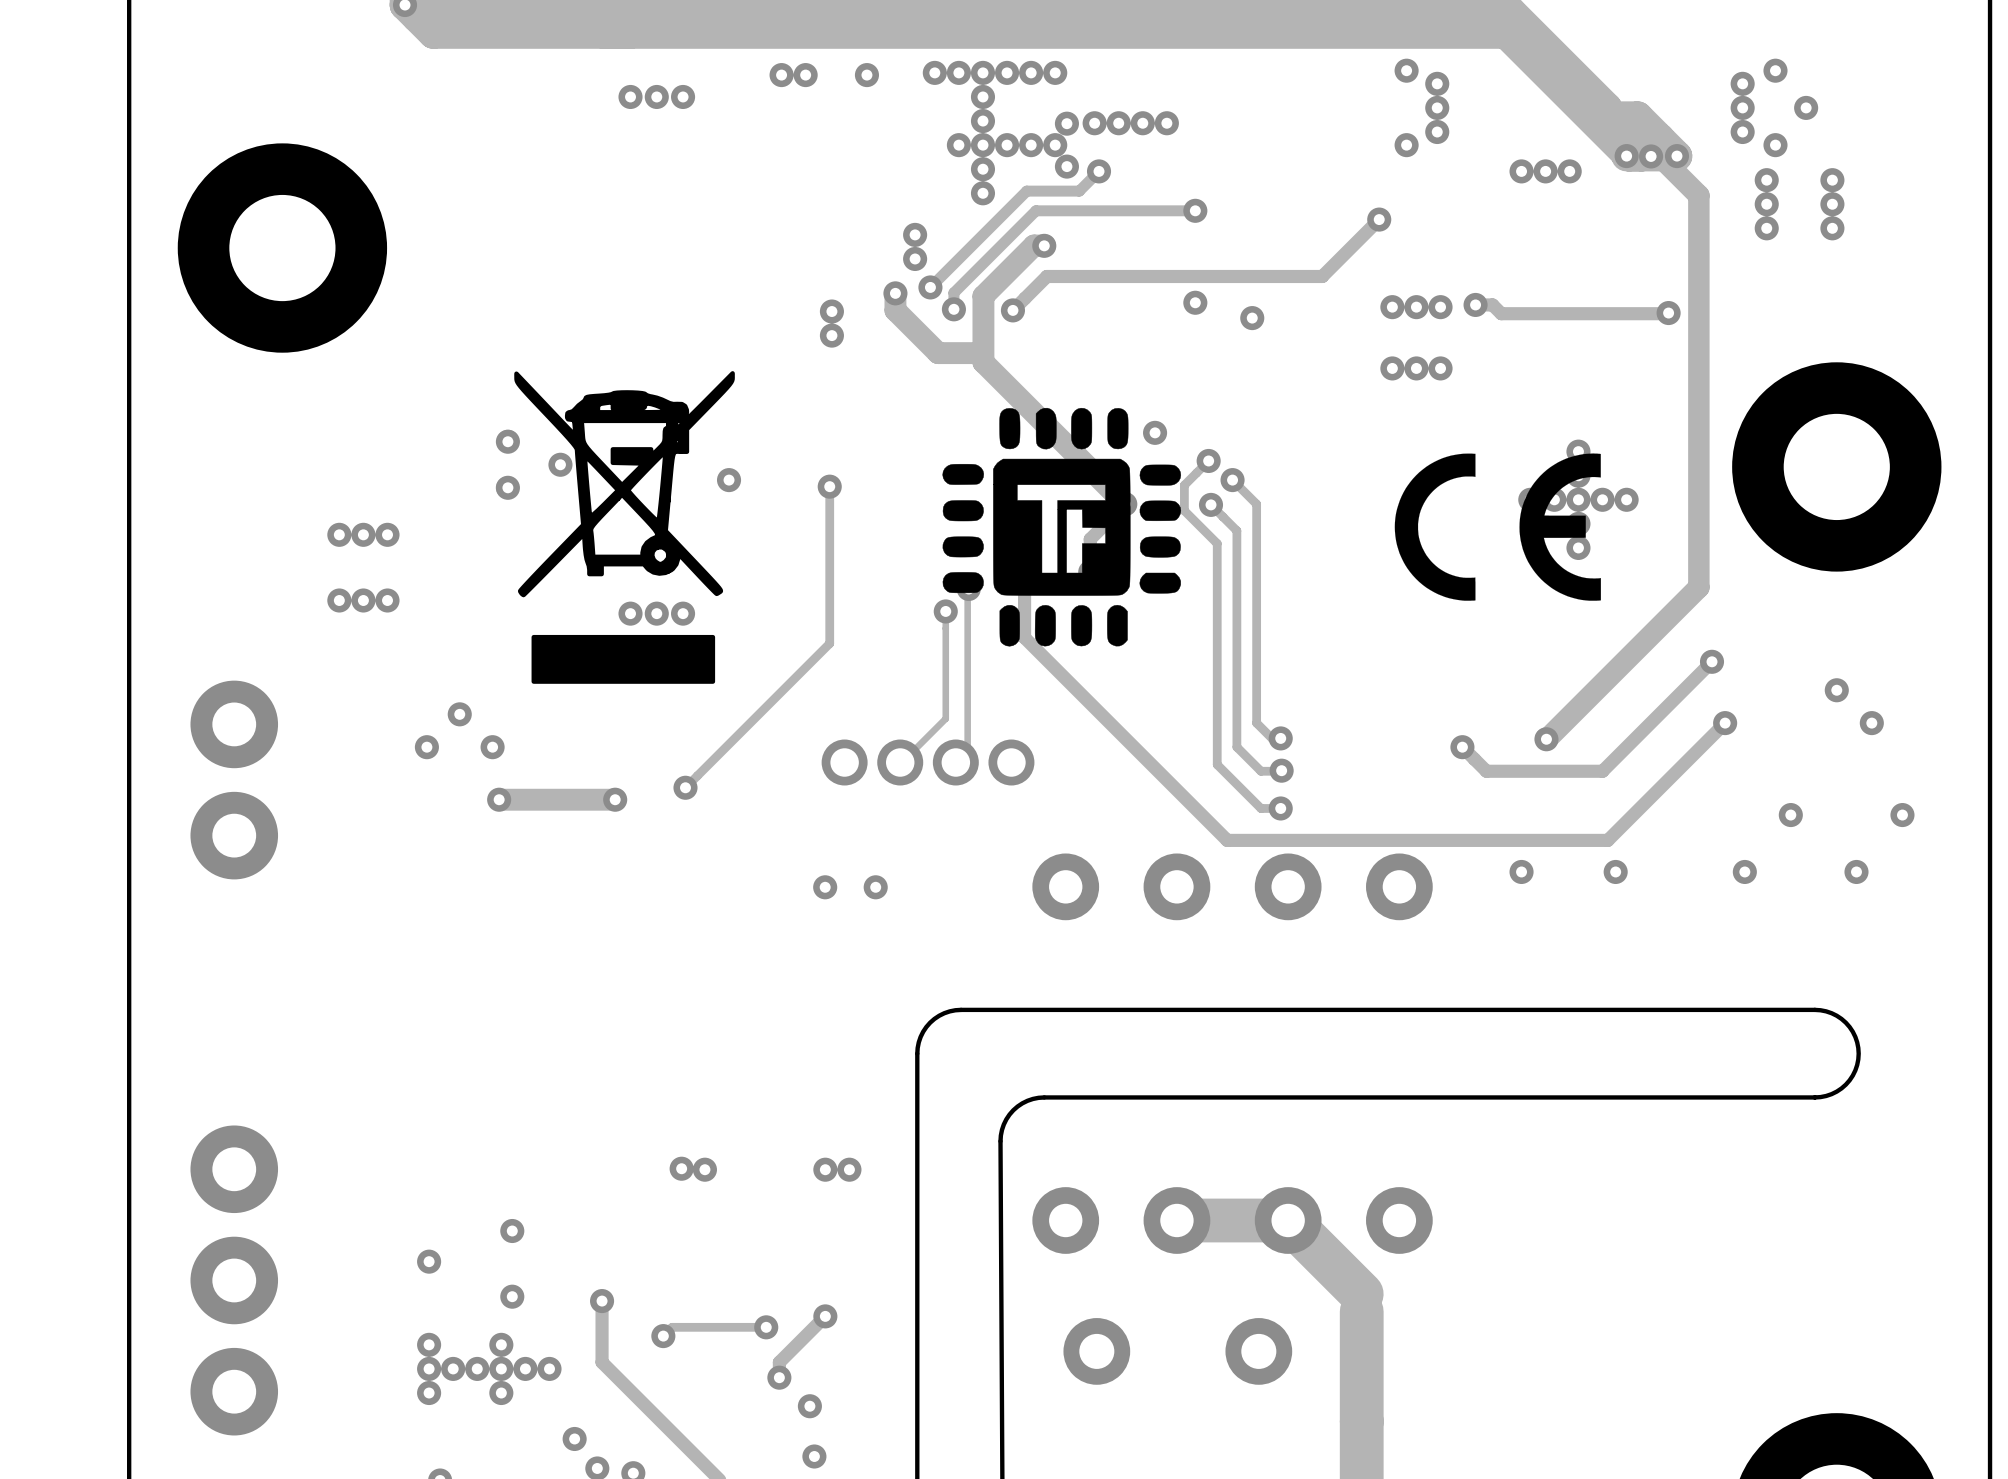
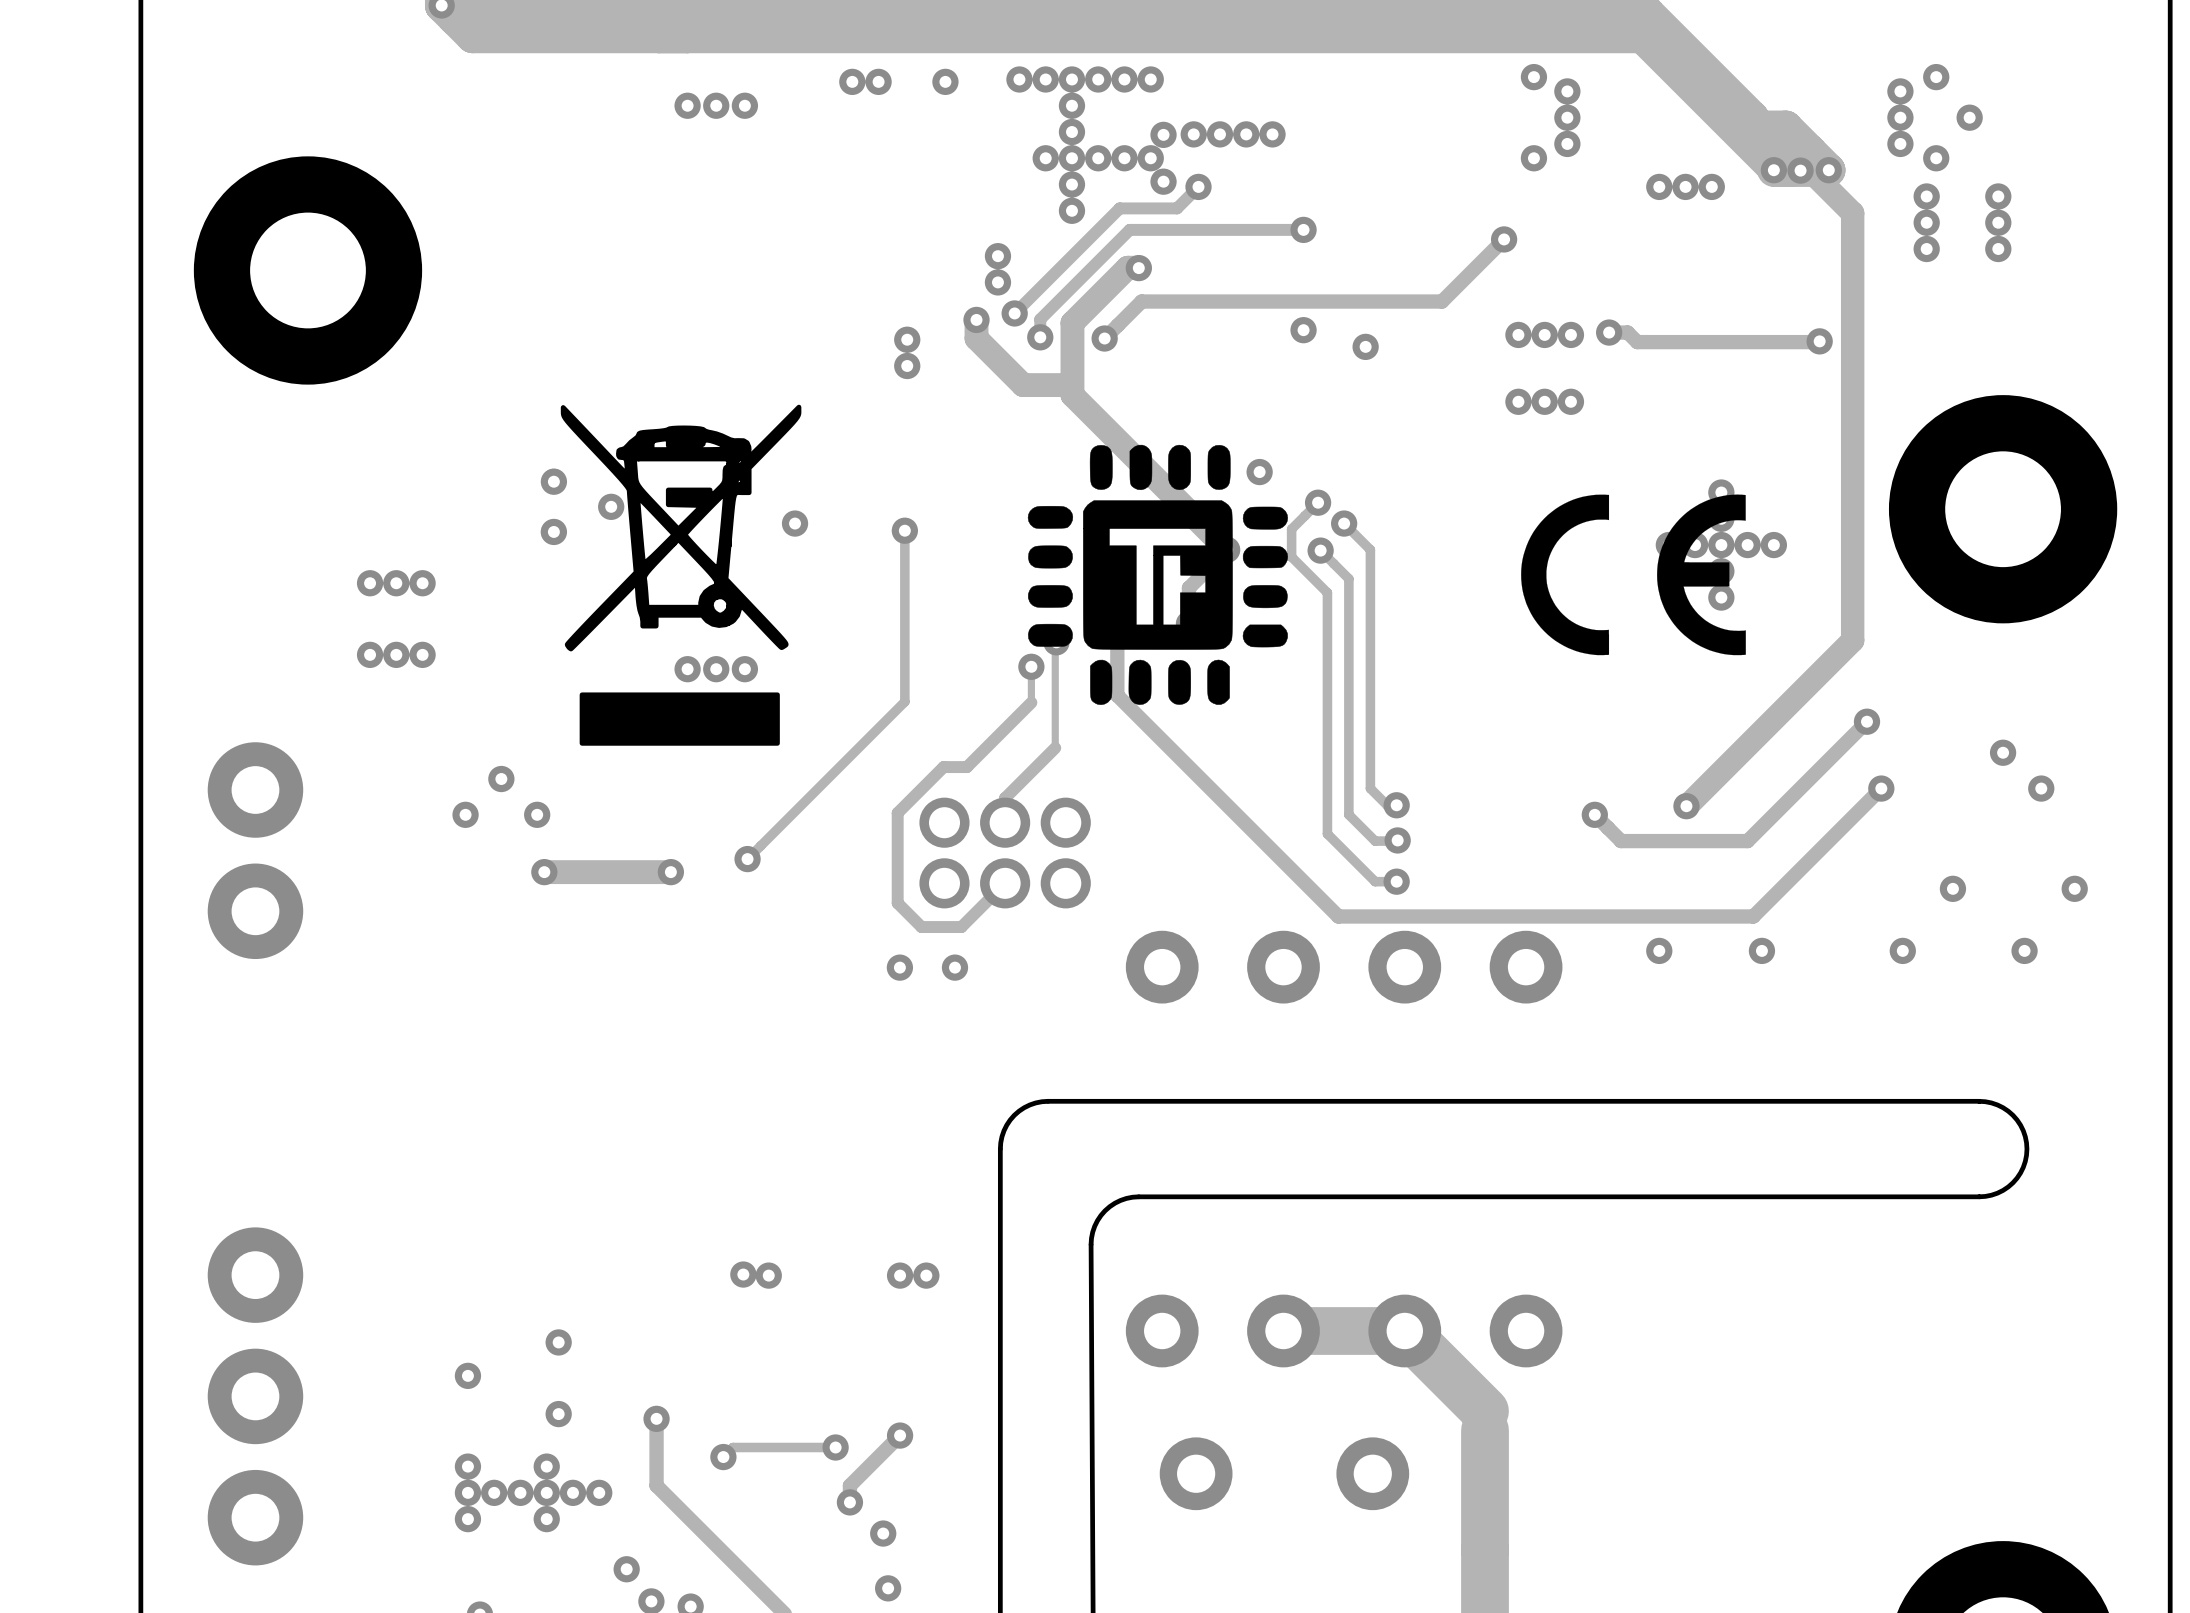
track: (945, 644) (945, 718) (899, 764) -> (1031, 702) (966, 767) (943, 767) (897, 813) (897, 903) (921, 927) (961, 927) (1005, 883)
track: (967, 685) (967, 751) (956, 762) -> (1055, 747) (1005, 798) (1005, 824)
part footprint: [821, 739, 1035, 786] -> [919, 797, 1091, 909]

